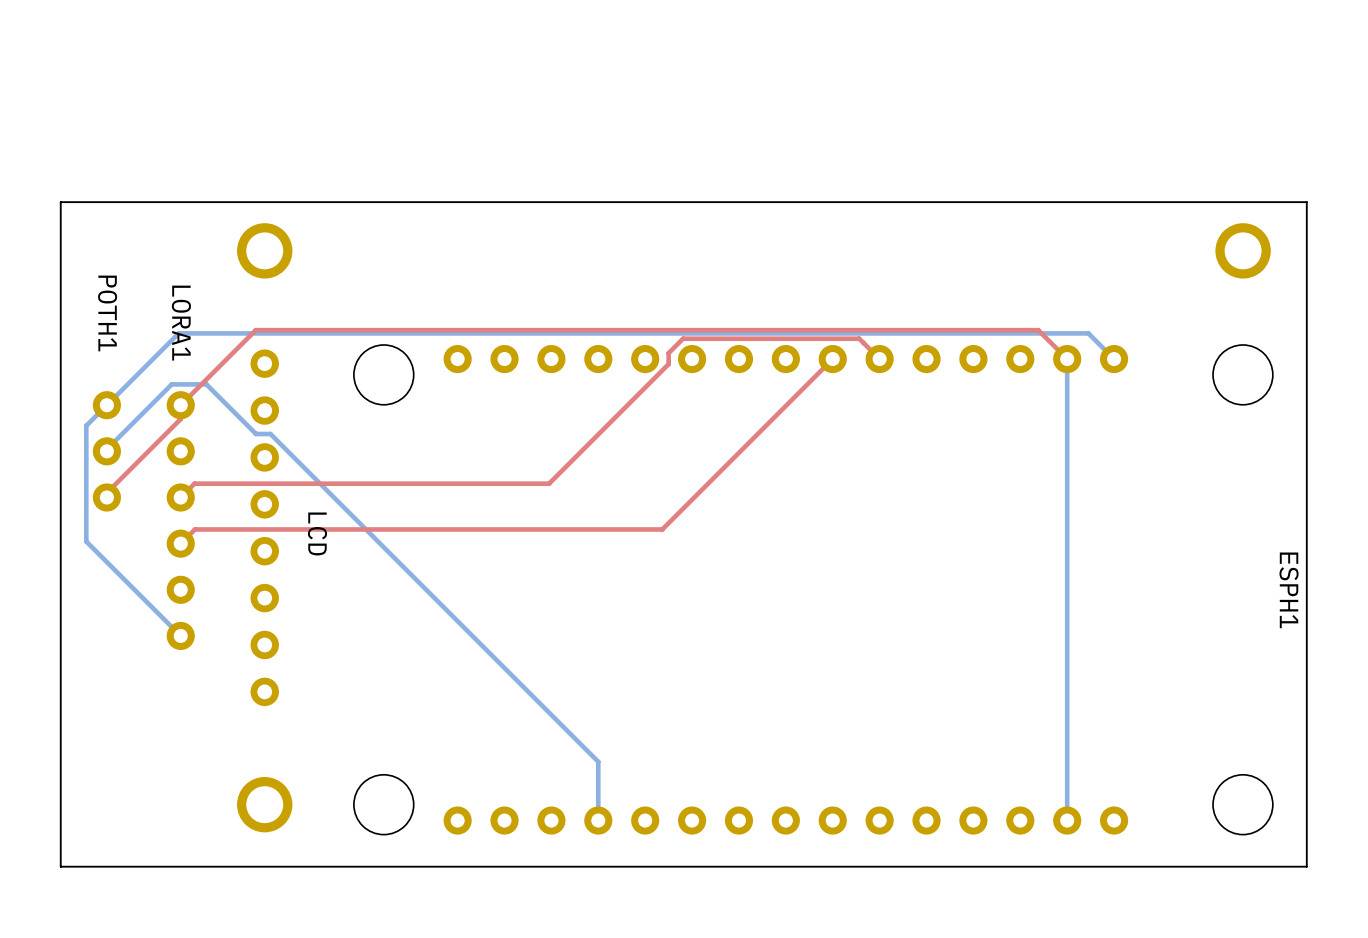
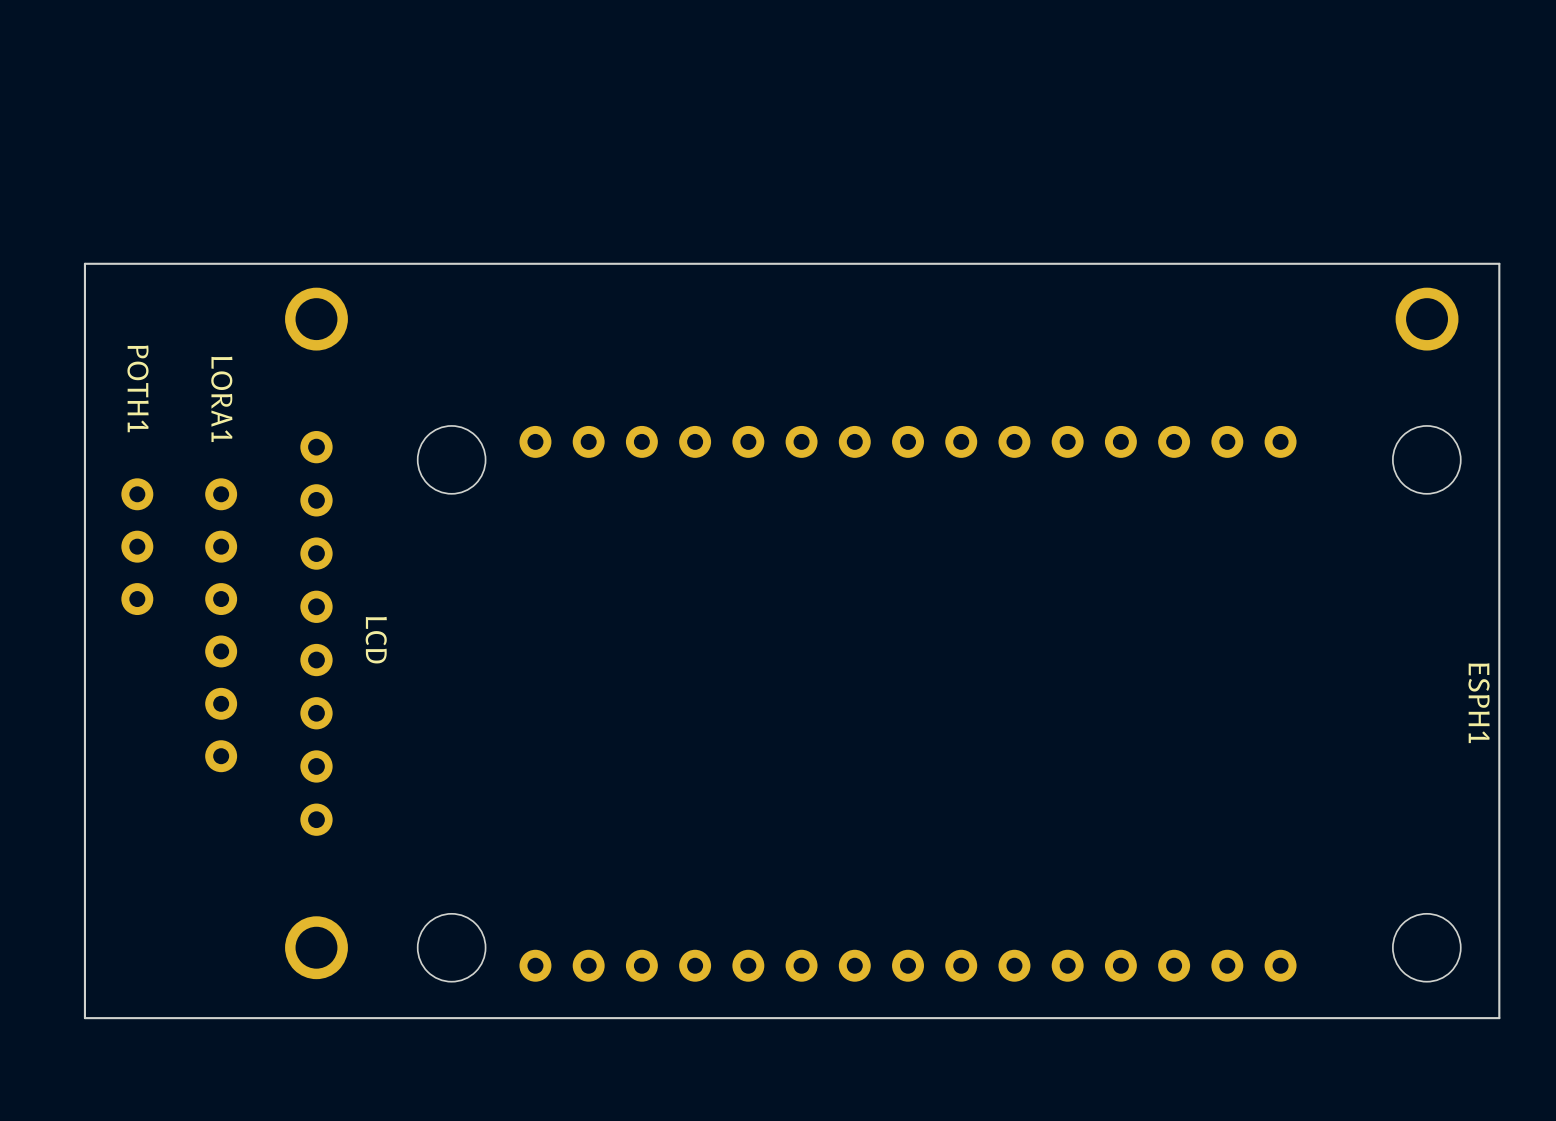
top track: (832, 359) (662, 529) (194, 529) (180, 543) -> none
top track: (879, 359) (859, 338) (683, 338) (668, 353) (668, 364) (549, 483) (194, 483) (180, 497) -> none
bottom track: (1067, 359) (1067, 820) -> none
top track: (1067, 359) (1038, 330) (255, 330) (180, 405) (180, 419) (106, 492) (106, 497) -> none
bottom track: (1114, 359) (1088, 333) (178, 333) (86, 425) (86, 541) (180, 635) -> none
bottom track: (106, 451) (171, 384) (206, 384) (256, 434) (270, 434) (598, 761) (598, 820) -> none

